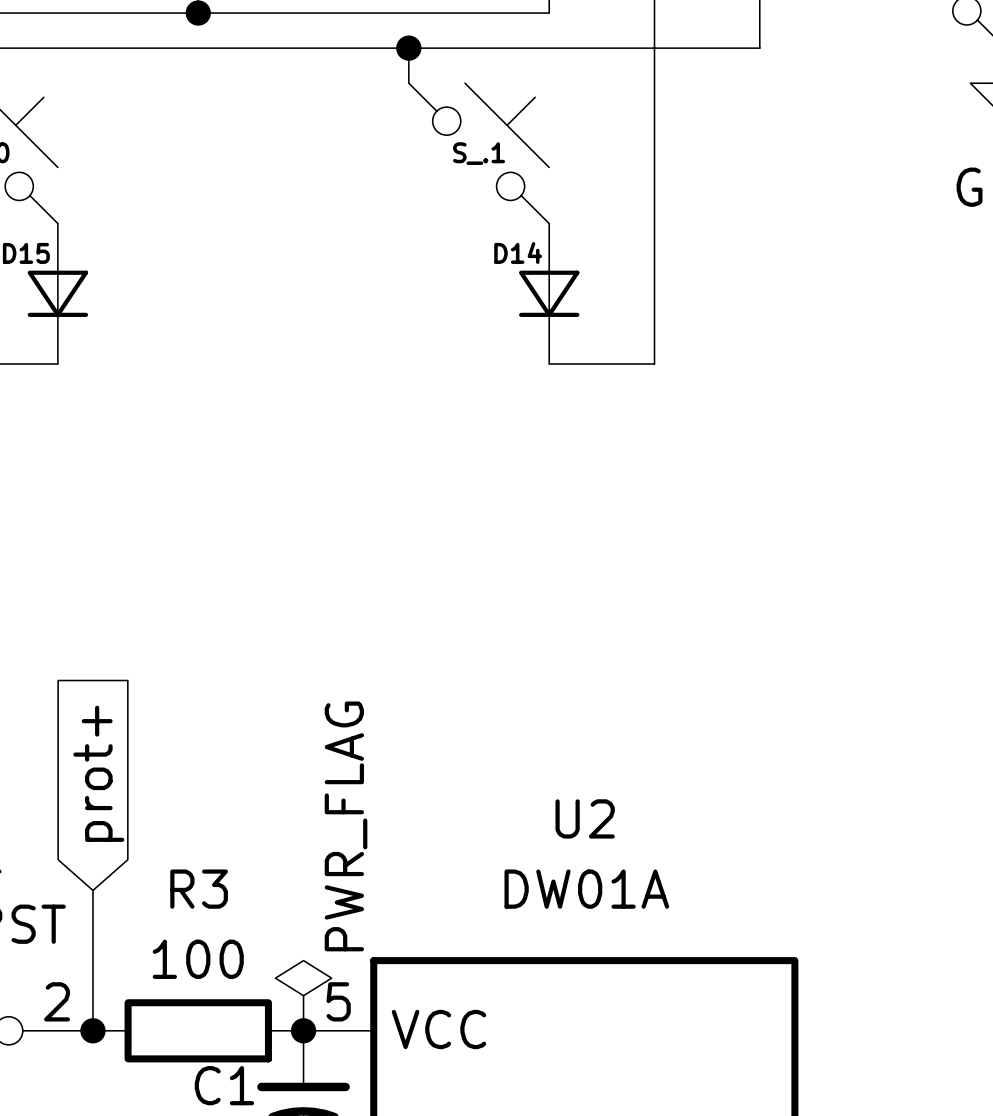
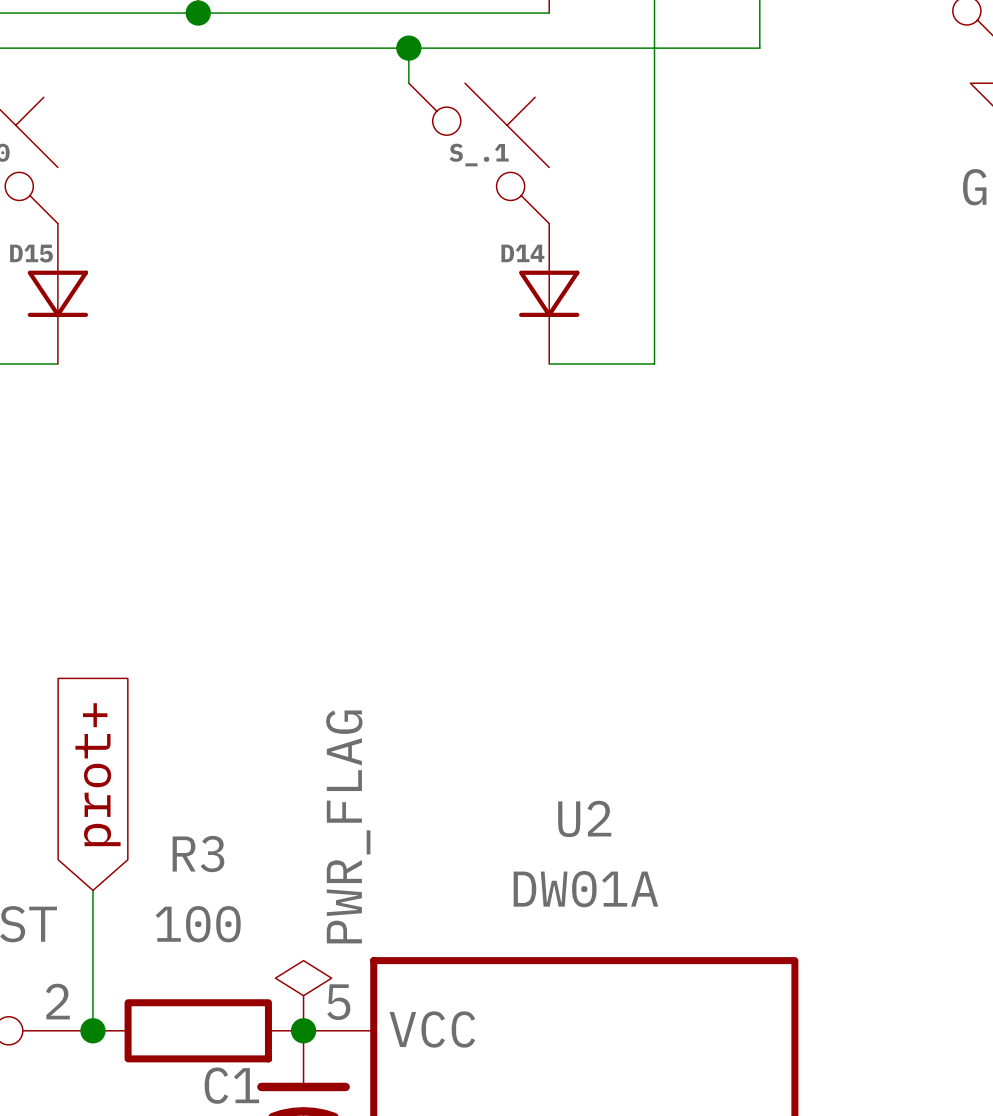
R3 name position: R3 (199, 889) -> R3 (198, 854)
R3 value position: 100 (198, 959) -> 100 (198, 924)

